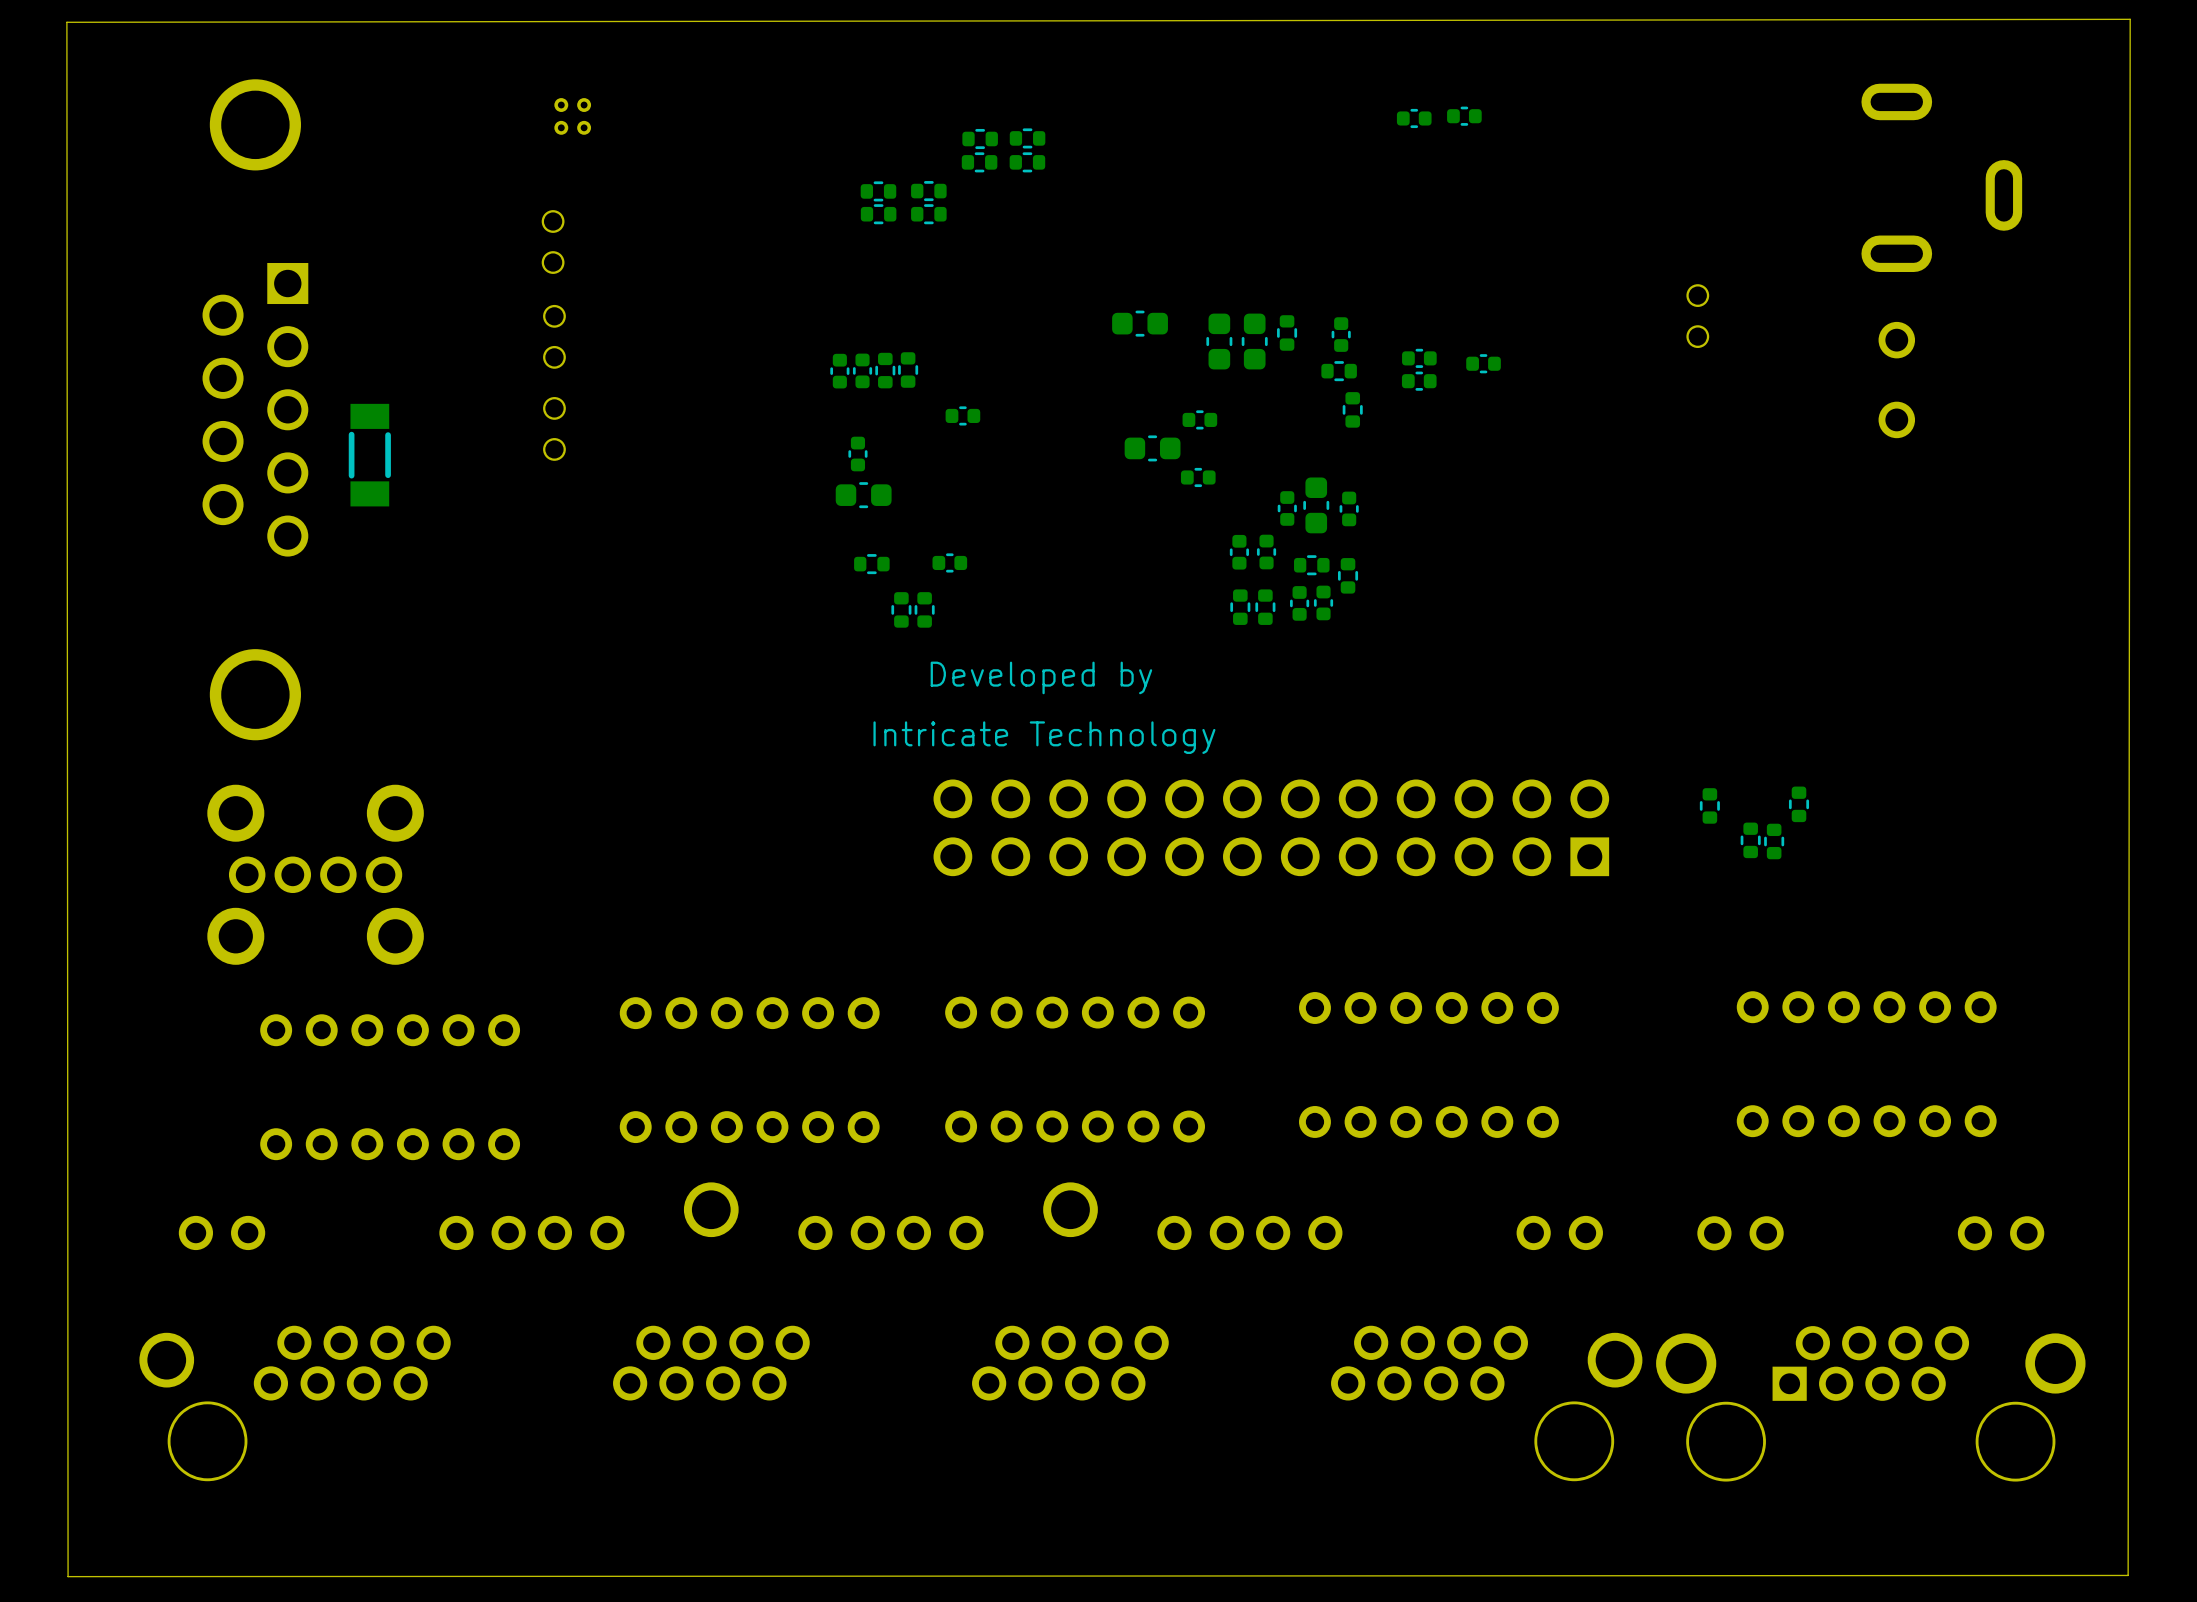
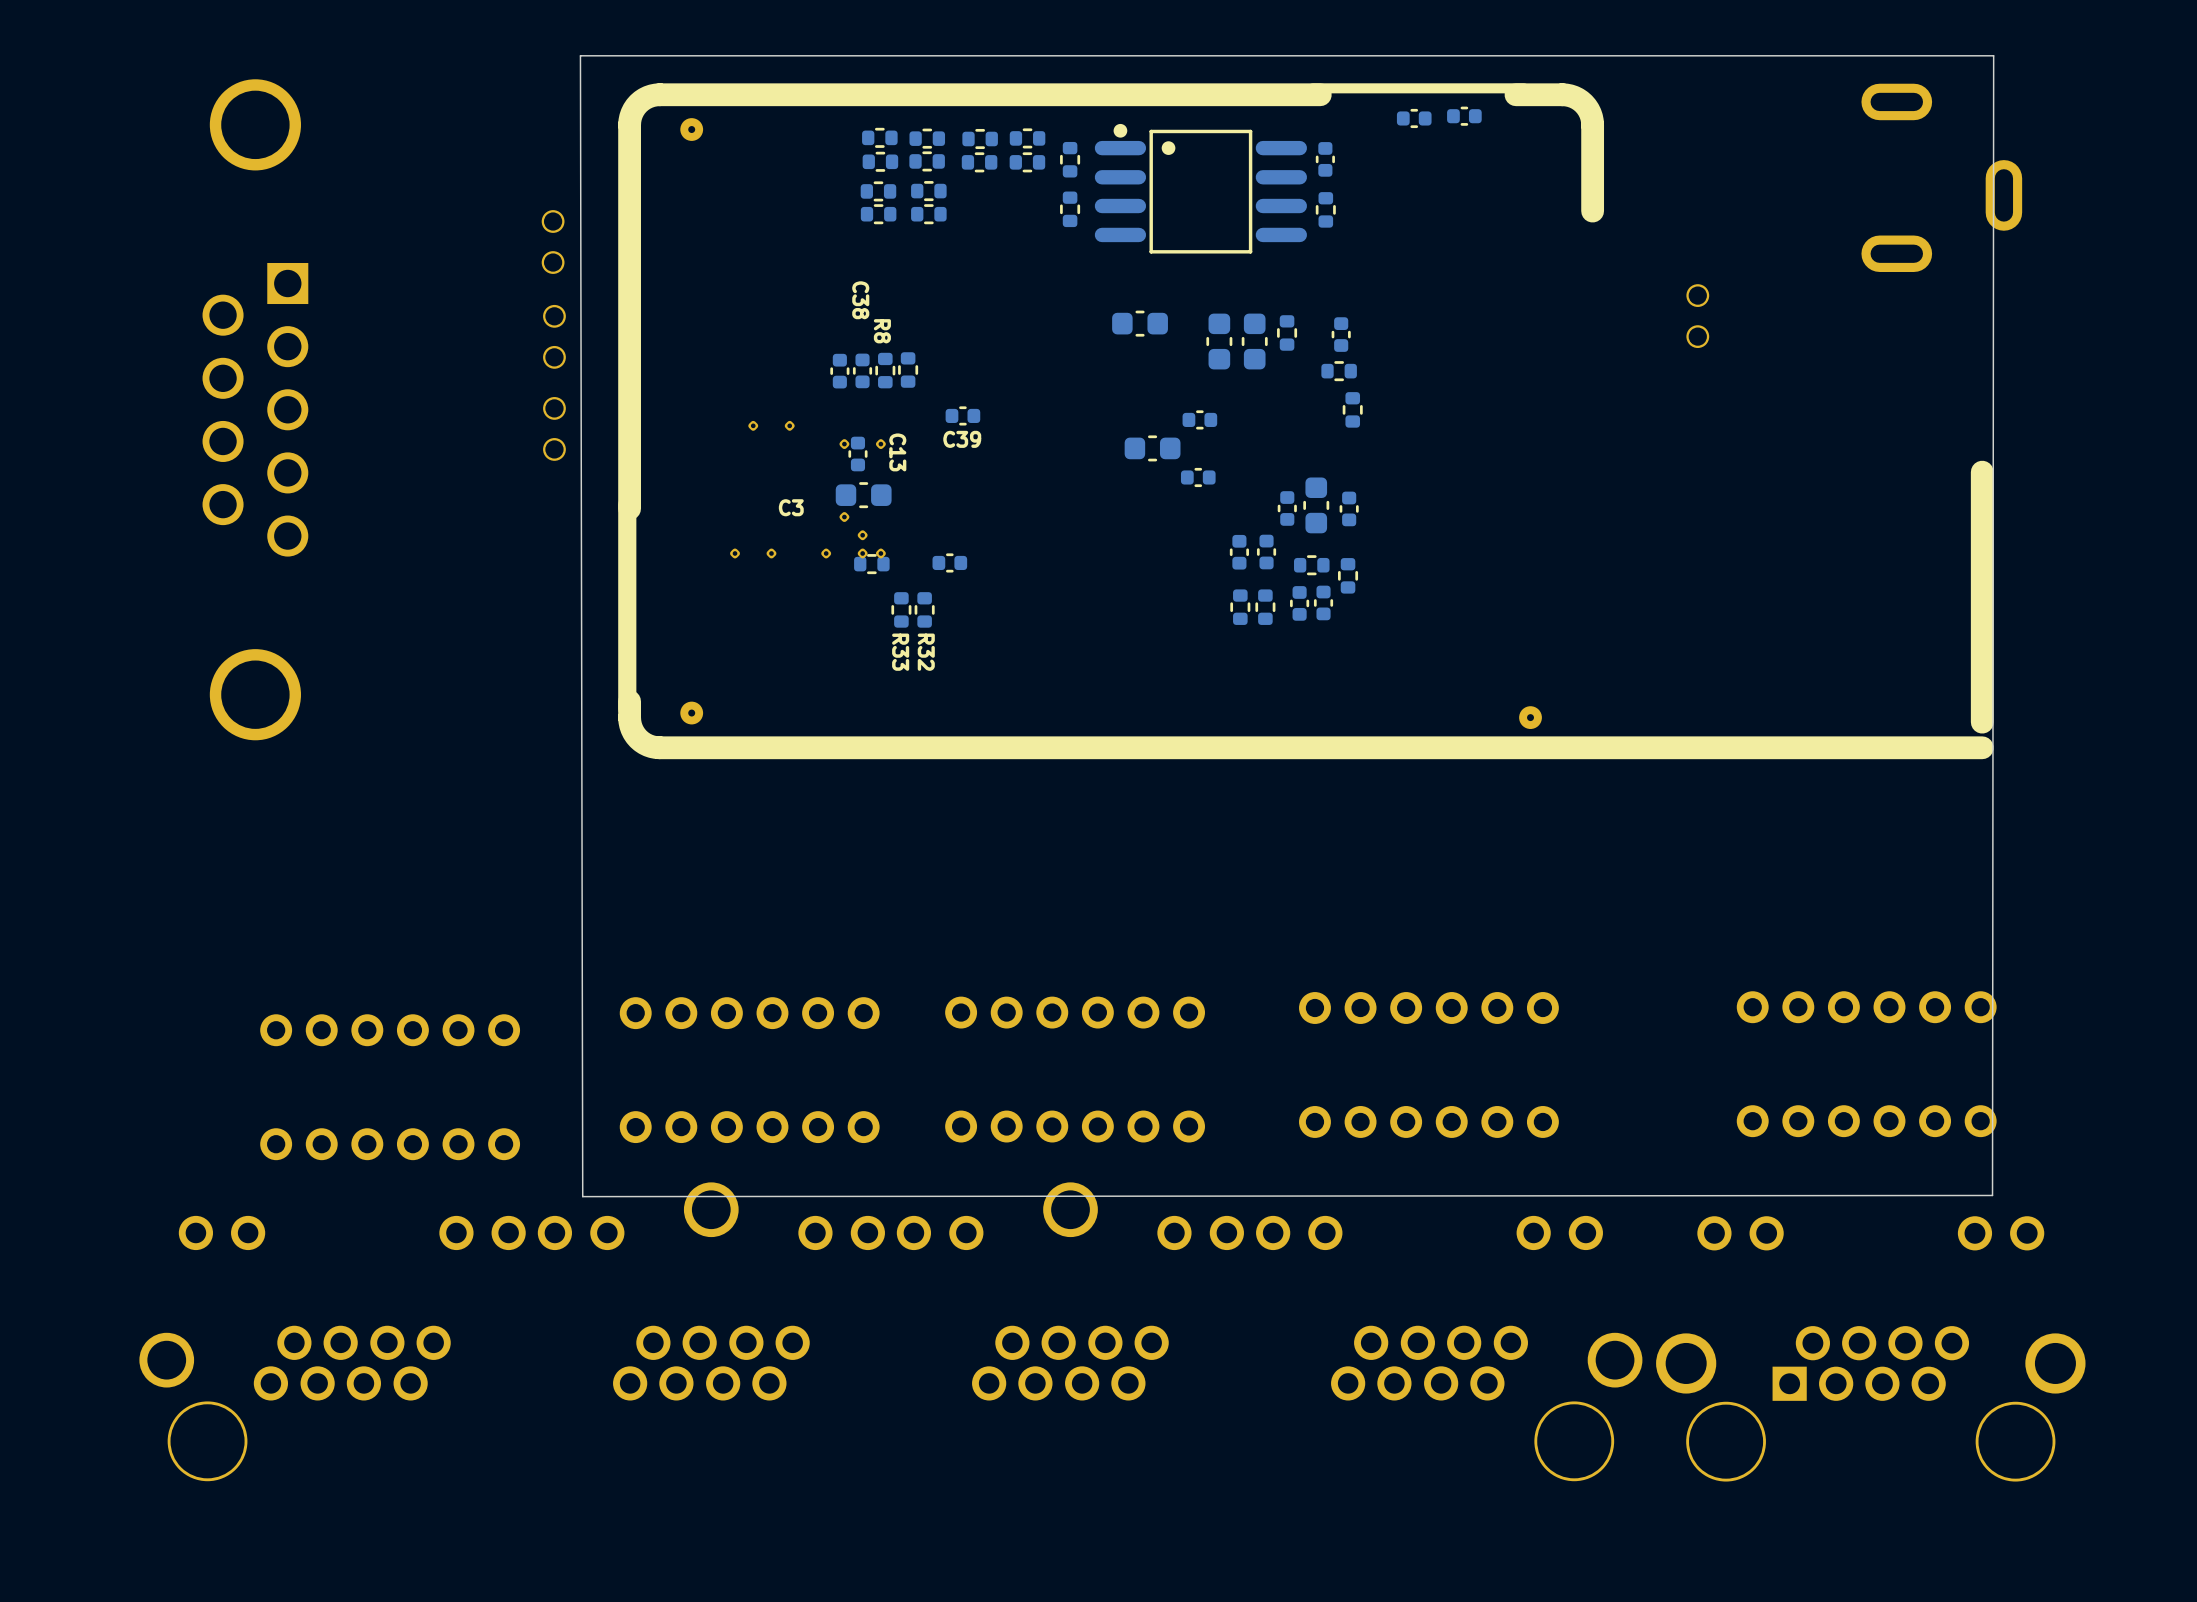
board edge: (2130, 19) (2128, 1575) (68, 1576) (66, 22) (2130, 19) -> (1993, 55) (1992, 1195) (582, 1196) (580, 55) (1993, 55)
line: none -> (1524, 88) (1312, 88)
line: none -> (1320, 94) (659, 94) (644, 98) (633, 109) (629, 124) (629, 508)
line: none -> (1515, 94) (1570, 95) (1580, 100) (1588, 109) (1592, 124) (1592, 211)
part: (572, 116) -> none
part: none -> (691, 129)
part: none -> (879, 137)
part: none -> (927, 138)
part: none -> (1070, 159)
part: none -> (1325, 159)
part: none -> (880, 161)
part: none -> (927, 161)
part: none -> (1200, 188)
part: none -> (1070, 209)
part: none -> (1325, 209)
C38 name: none -> C38 (860, 300)
R8 name: none -> R8 (882, 331)
part: (1419, 358) -> none
part: (1483, 363) -> none
part: (1896, 380) -> none
part: (1419, 381) -> none
part: none -> (753, 425)
part: none -> (789, 425)
C39 name: none -> C39 (962, 439)
part: none -> (844, 444)
part: none -> (880, 444)
C13 name: none -> C13 (897, 452)
part: (369, 455) -> none
line: none -> (1982, 472) (1982, 722)
line: none -> (627, 504) (627, 708)
C3 name: none -> C3 (791, 507)
part: none -> (844, 517)
part: none -> (862, 535)
part: none -> (735, 553)
part: none -> (771, 553)
part: none -> (826, 553)
part: none -> (862, 553)
part: none -> (880, 553)
R33 name: none -> R33 (900, 652)
R32 name: none -> R32 (926, 652)
text: Developed by (1041, 677) -> none
line: none -> (629, 701) (629, 721) (633, 732) (644, 743) (659, 747) (1982, 747)
part: none -> (691, 713)
part: none -> (1530, 717)
text: Intricate Technology (1044, 737) -> none
part: (1799, 804) -> none
part: (1709, 805) -> none
part: (1271, 827) -> none
part: (1750, 840) -> none
part: (1774, 841) -> none
part: (315, 874) -> none

